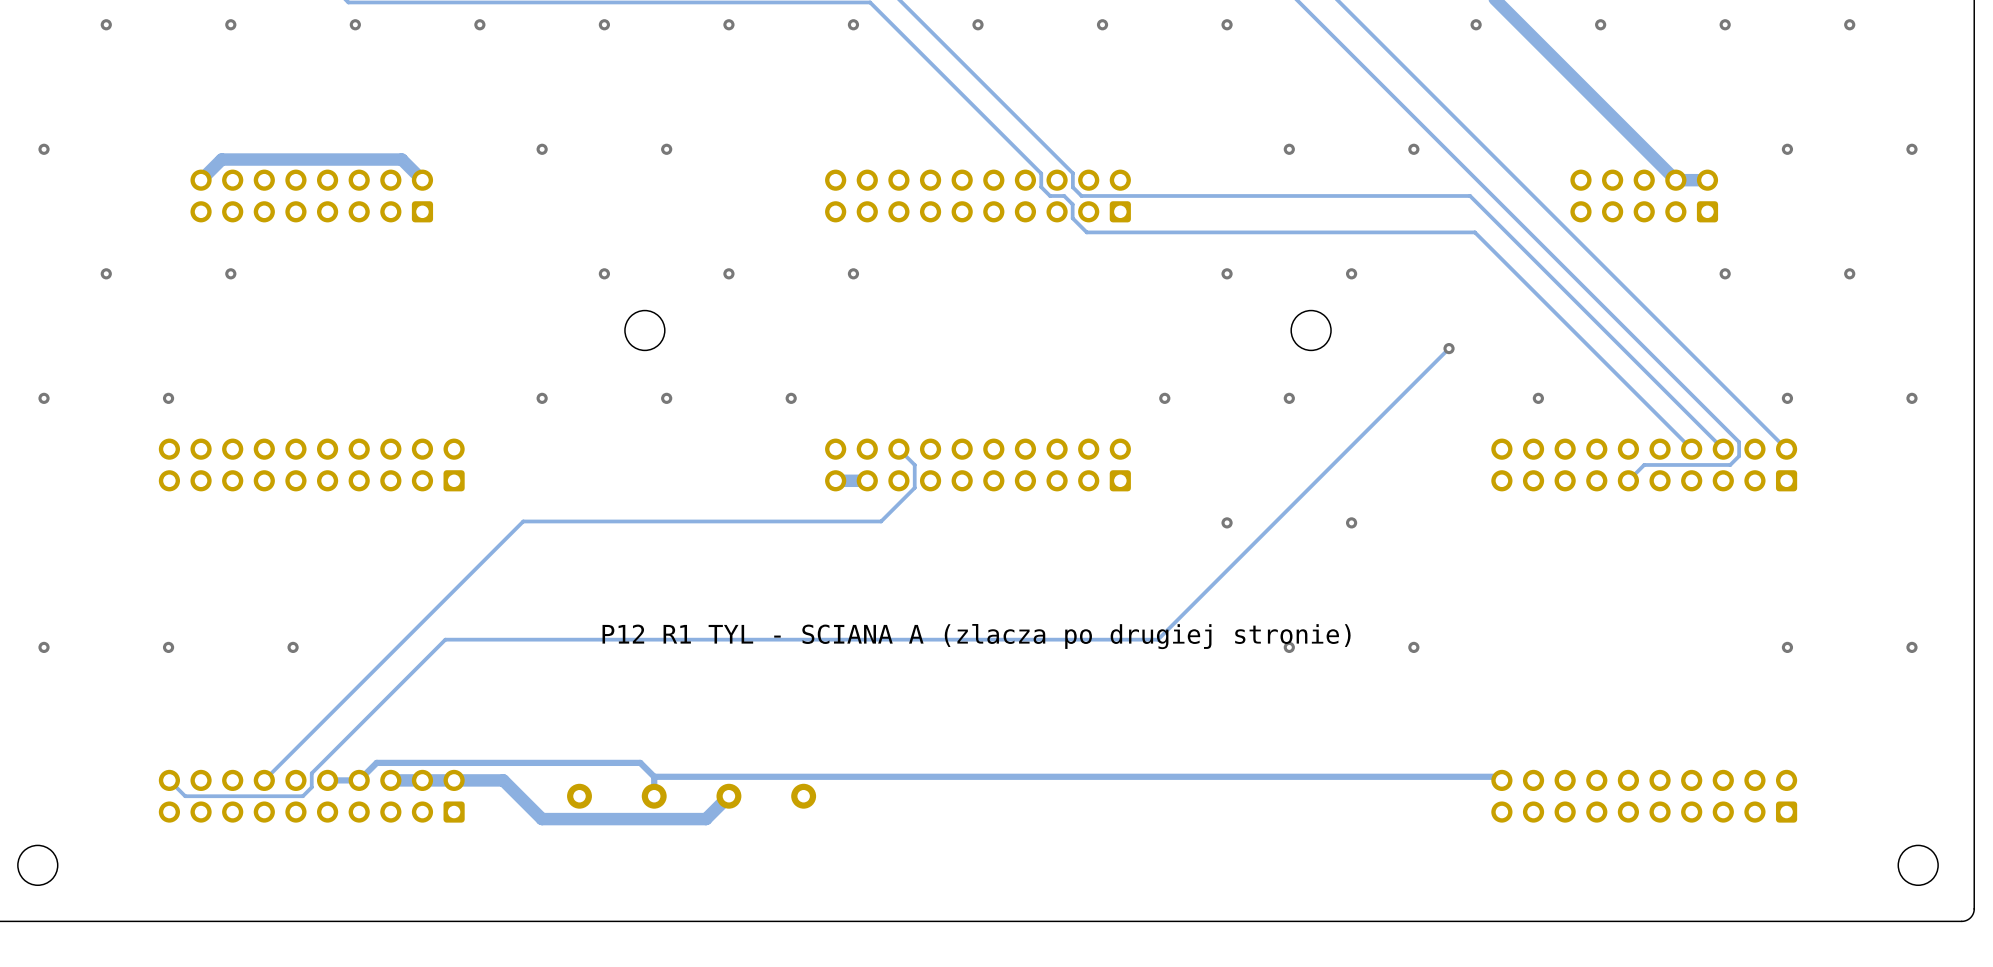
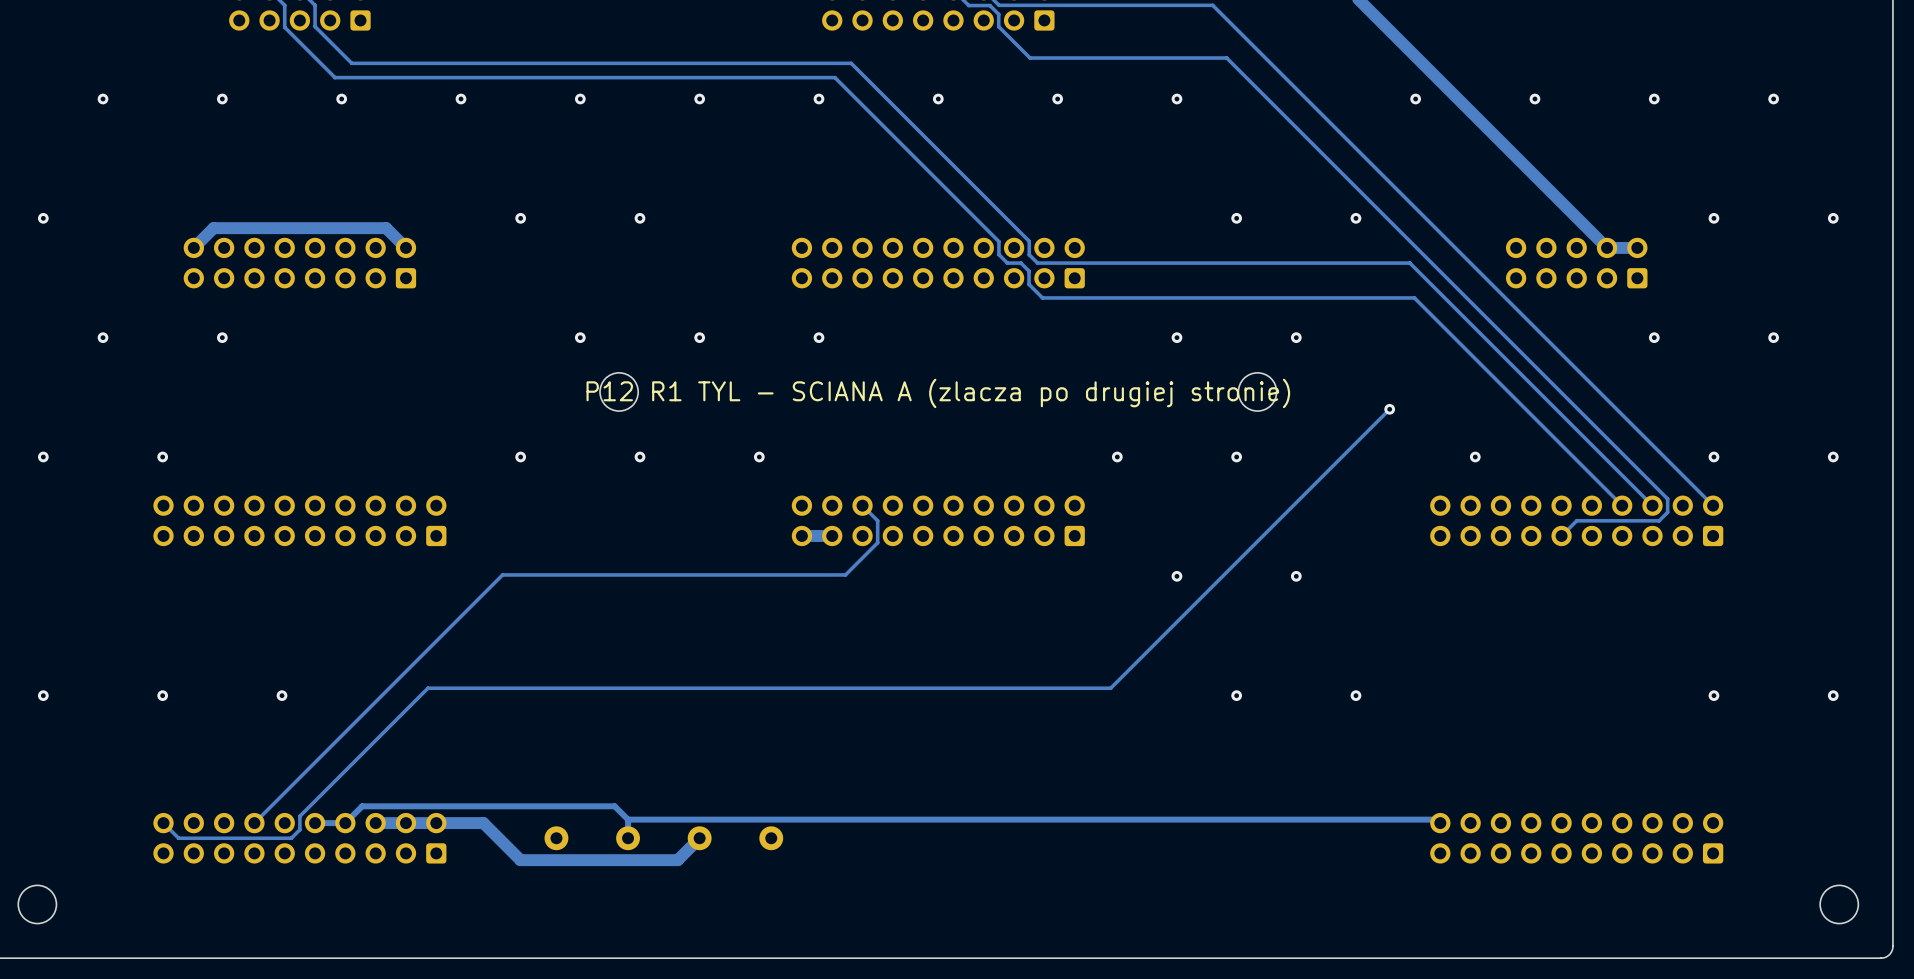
text position: P12 R1 TYL - SCIANA A (zlacza po drugiej stronie) (976, 636) -> P12 R1 TYL - SCIANA A (zlacza po drugiej stronie) (938, 393)

